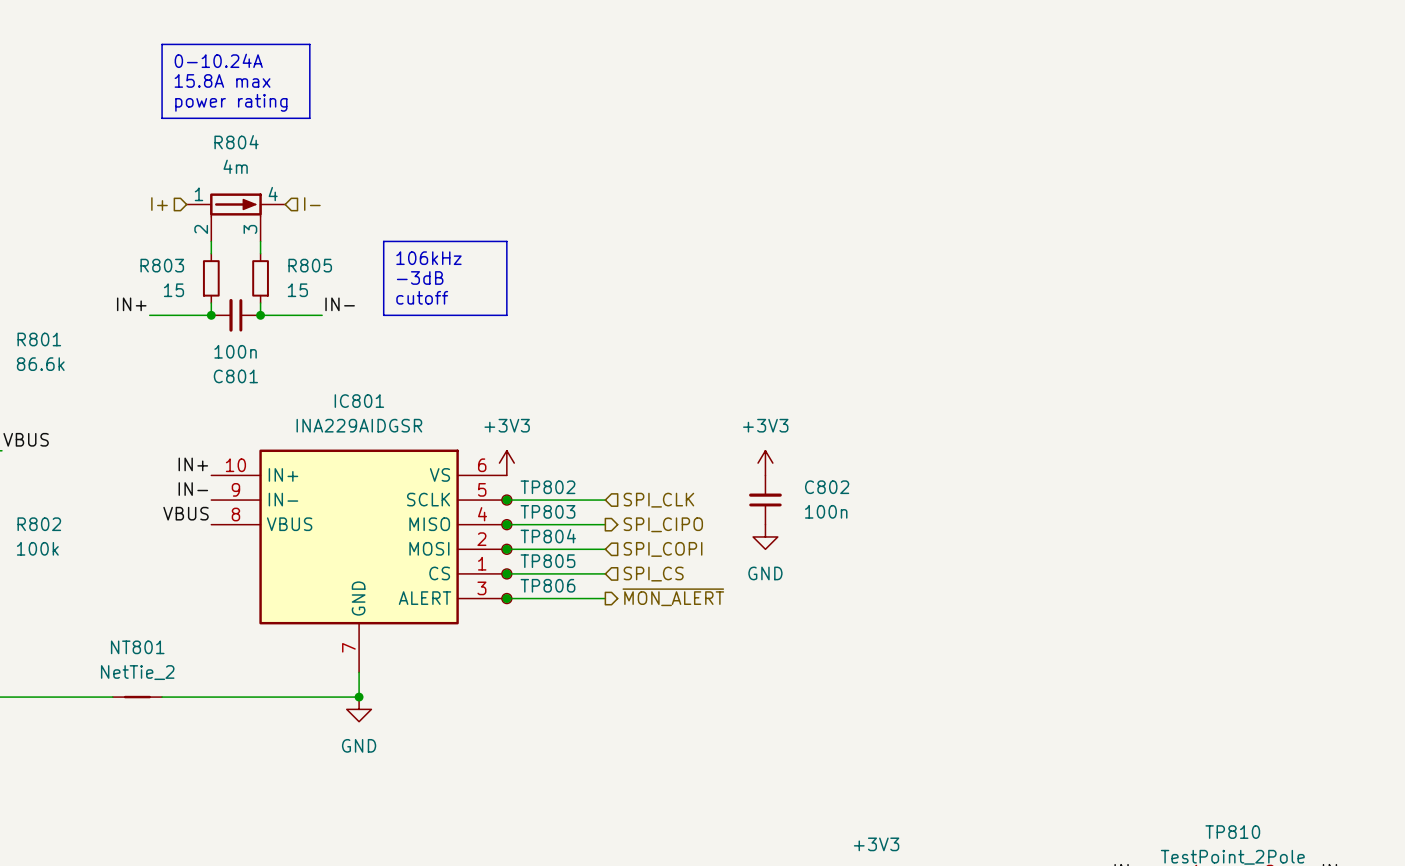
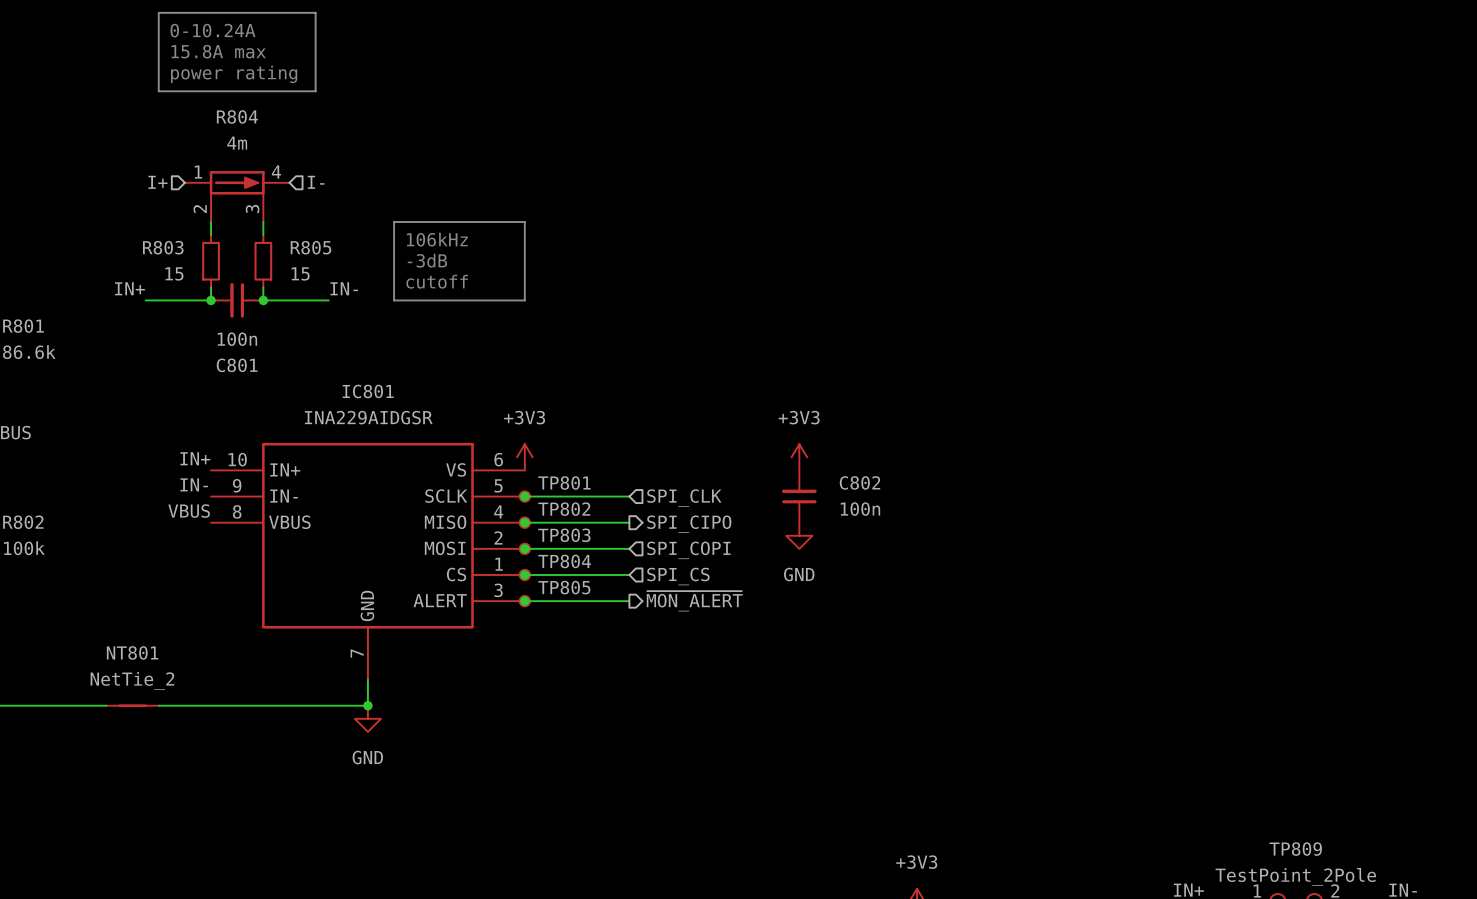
TP802 name: TP802 (547, 487) -> TP801 (564, 483)
TP803 name: TP803 (547, 511) -> TP802 (564, 509)
TP804 name: TP804 (548, 536) -> TP803 (564, 535)
TP805 name: TP805 (547, 561) -> TP804 (564, 561)
TP806 name: TP806 (547, 585) -> TP805 (564, 587)
TP810 name: TP810 (1232, 832) -> TP809 (1295, 849)

